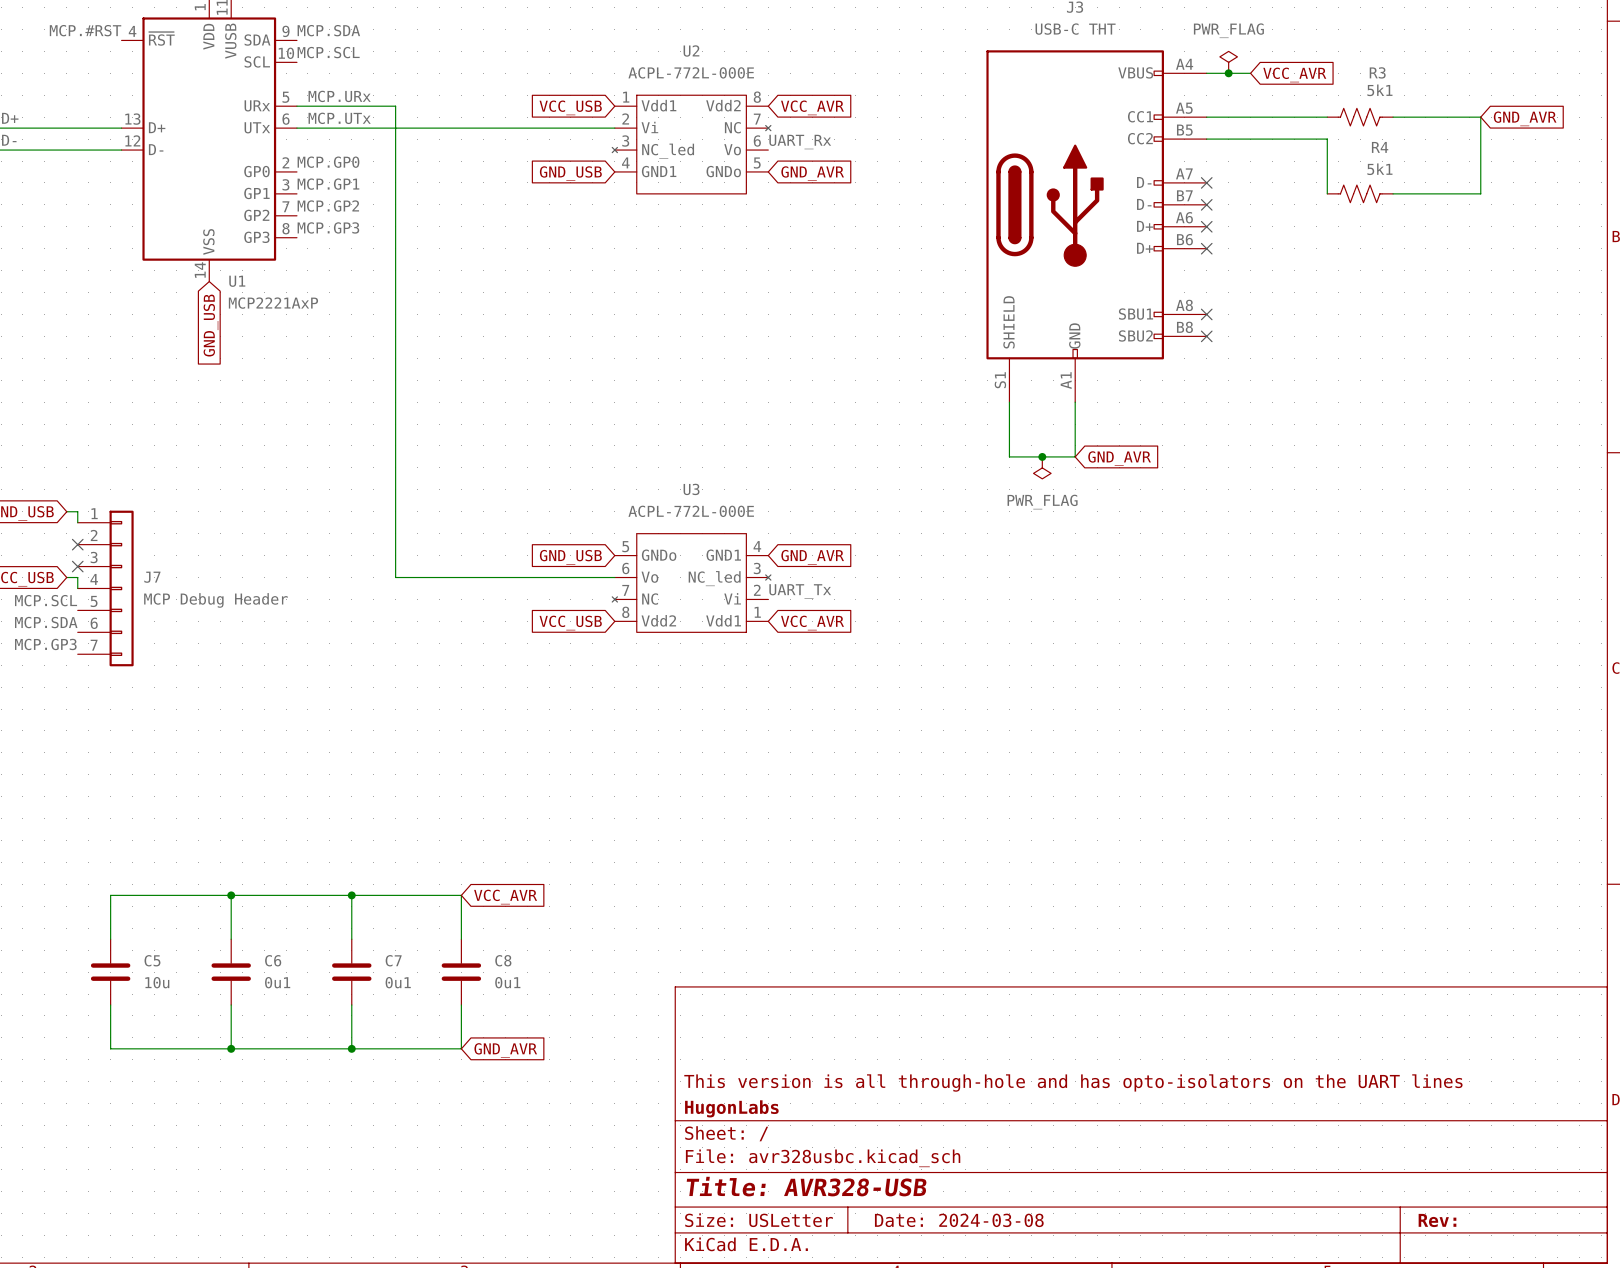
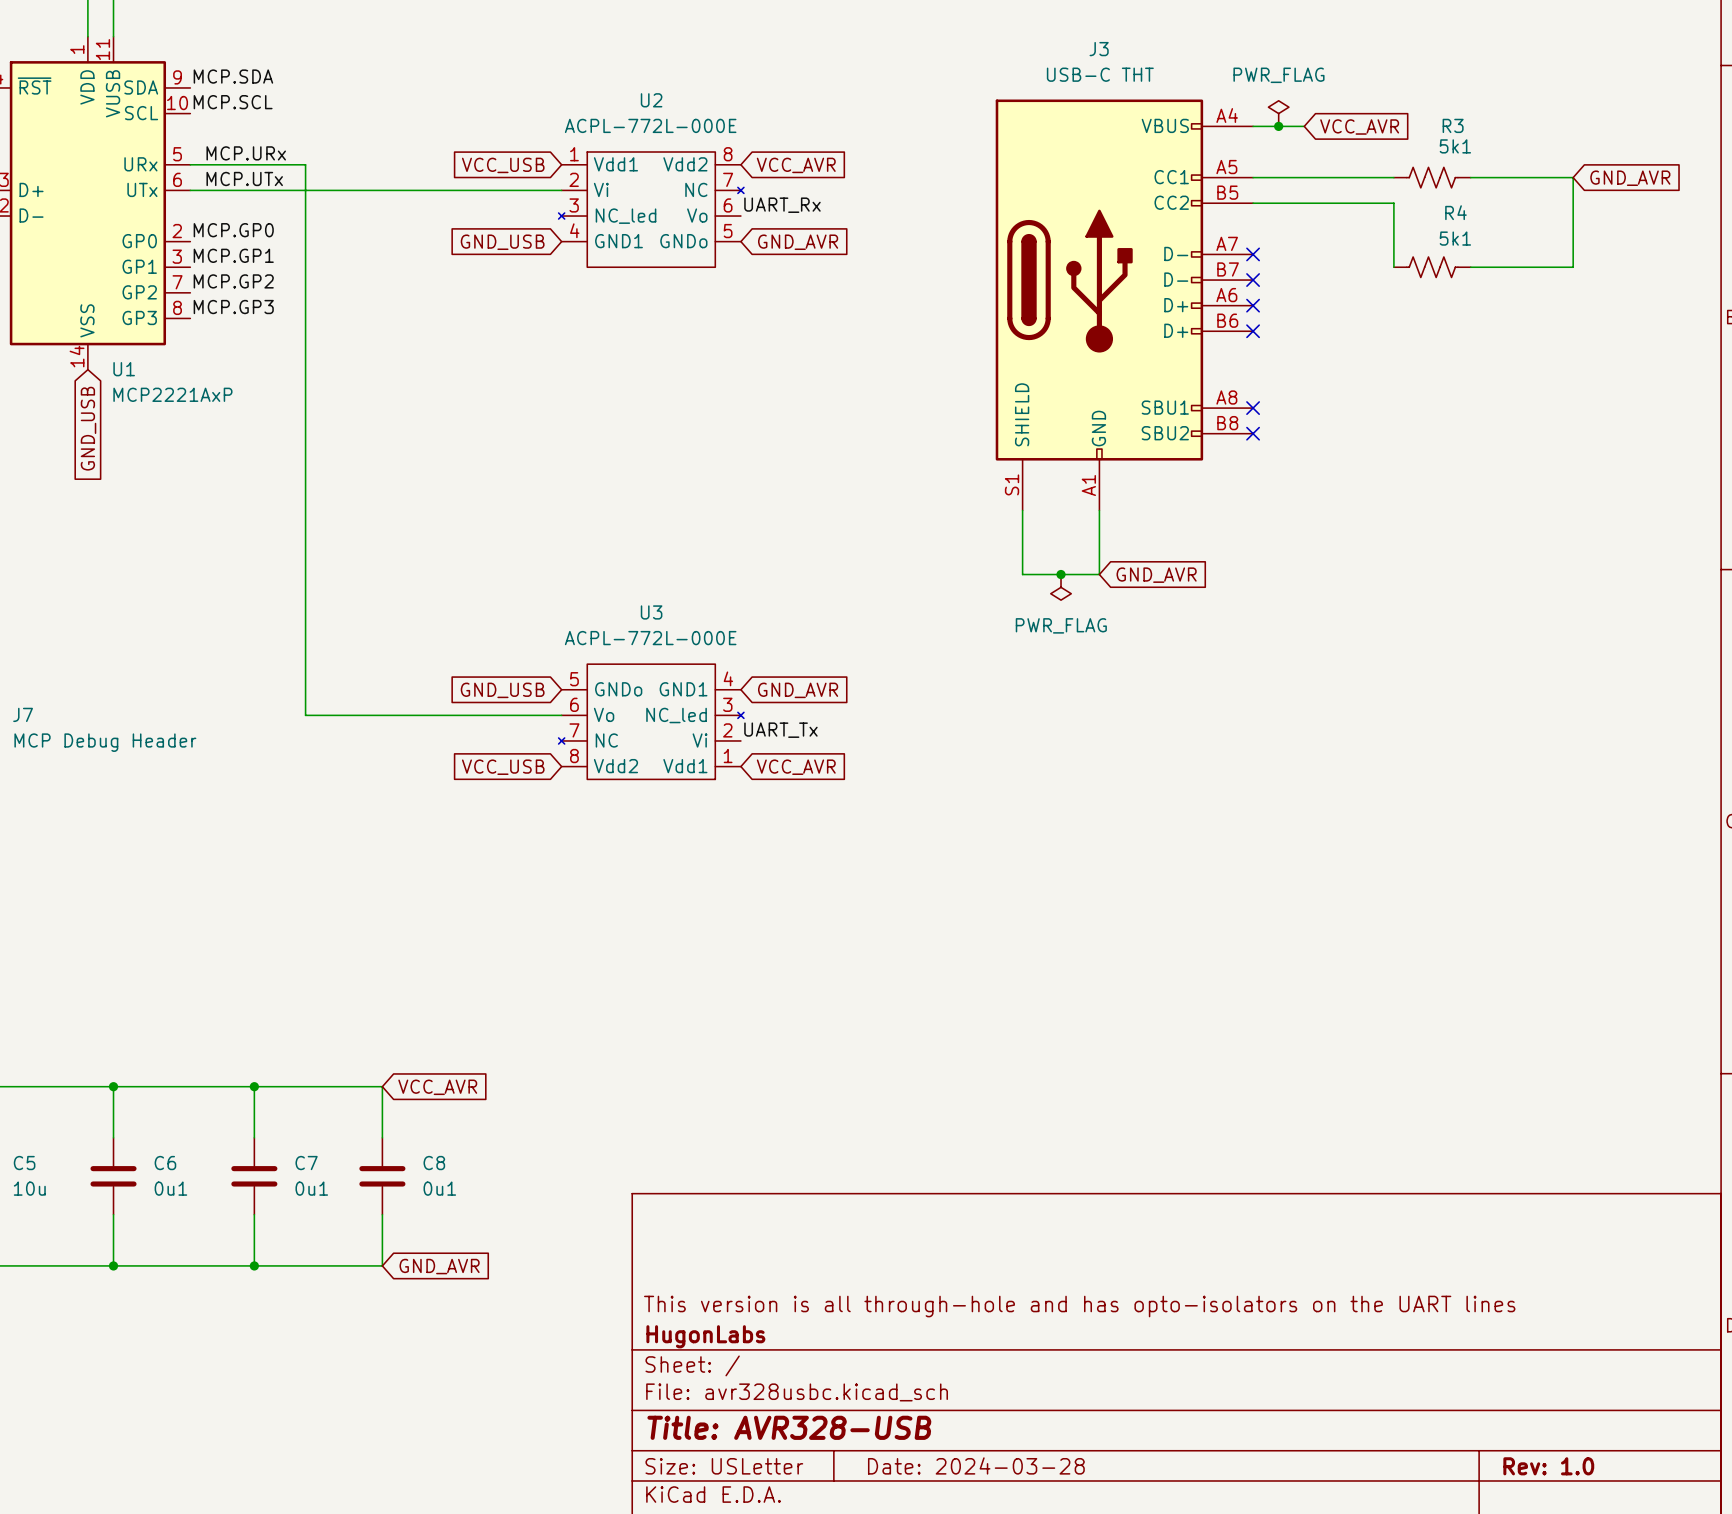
title block: Date: 2024-03-08 (959, 1220) -> Date: 2024-03-28 (976, 1465)
title block: Rev: (1437, 1220) -> Rev: 1.0 (1548, 1466)

